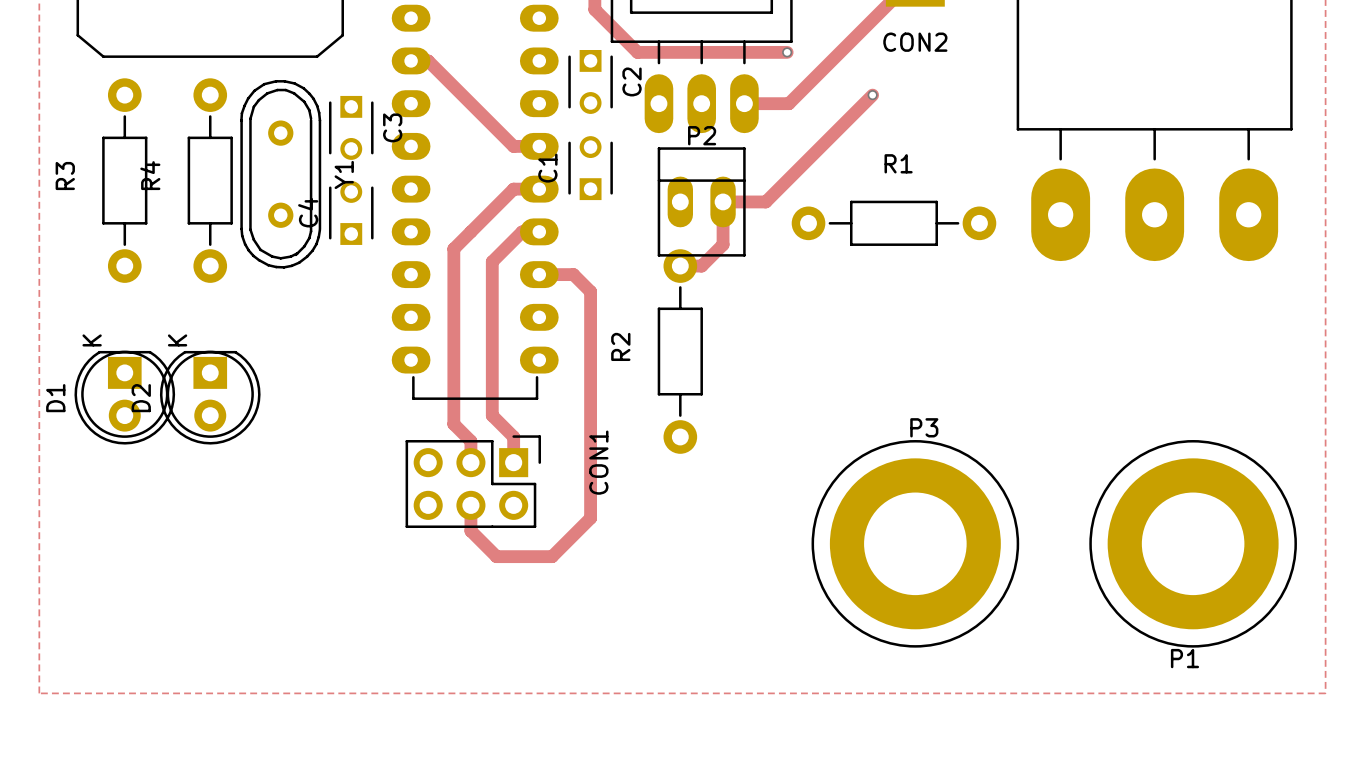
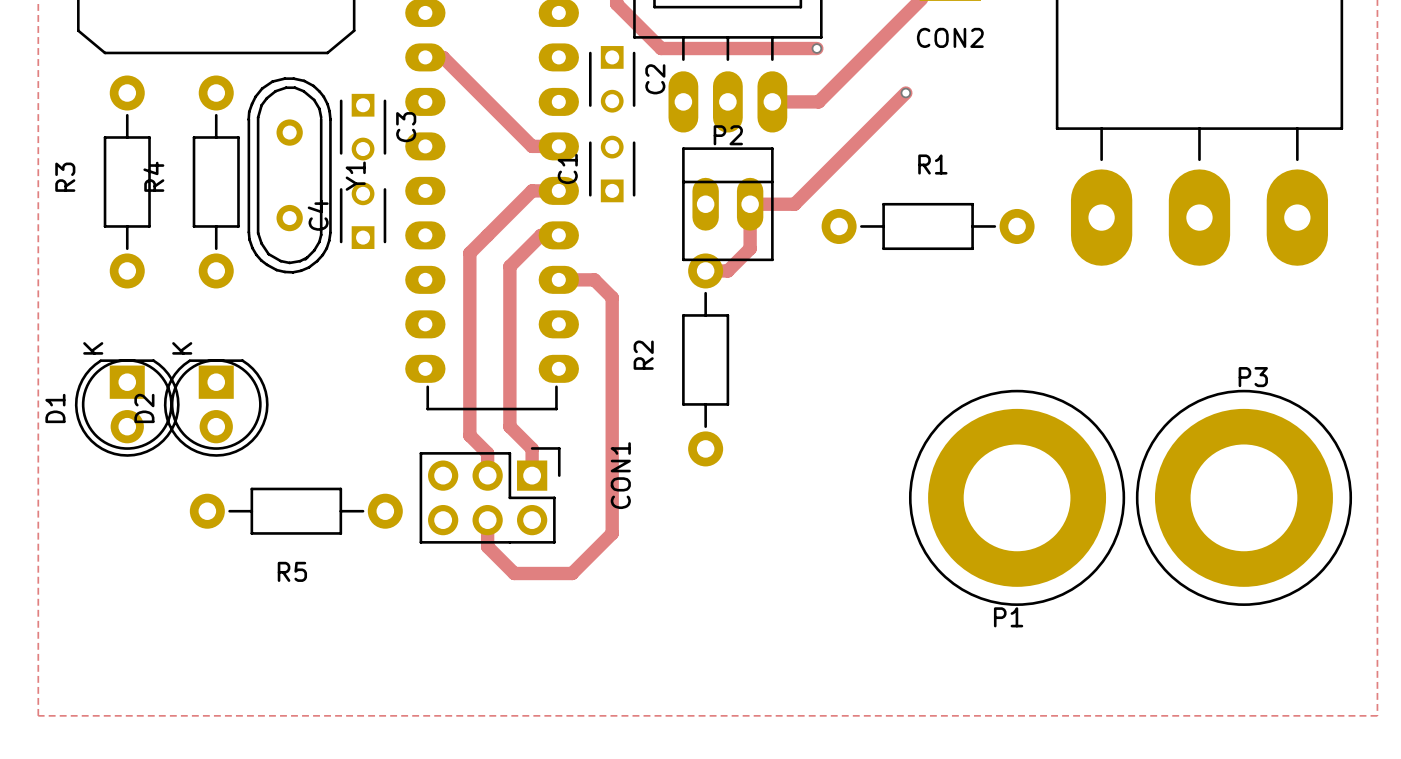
R5: none -> (296, 511)
P3 position: (915, 543) -> (1243, 497)
P1 position: (1193, 543) -> (1017, 497)

